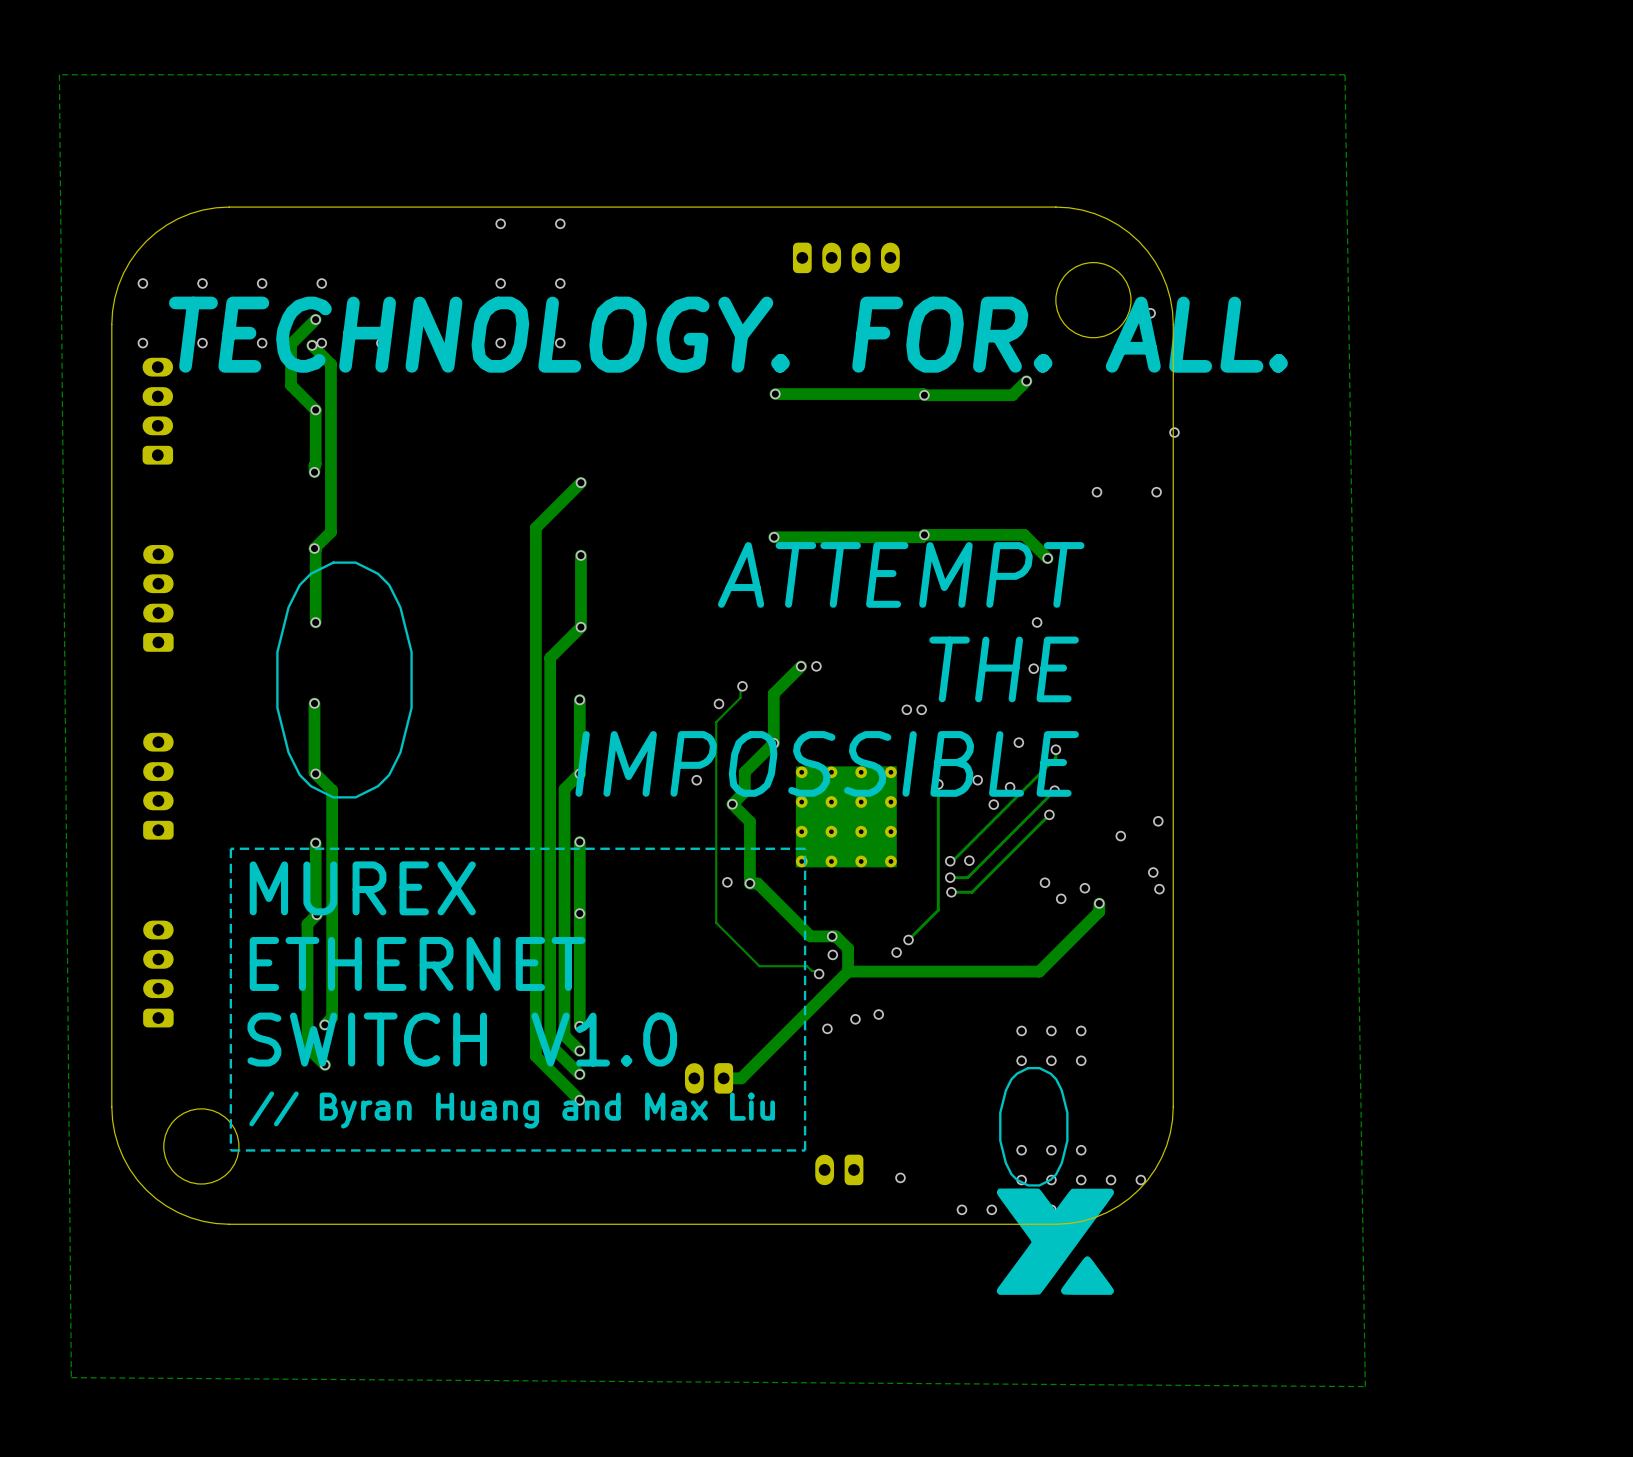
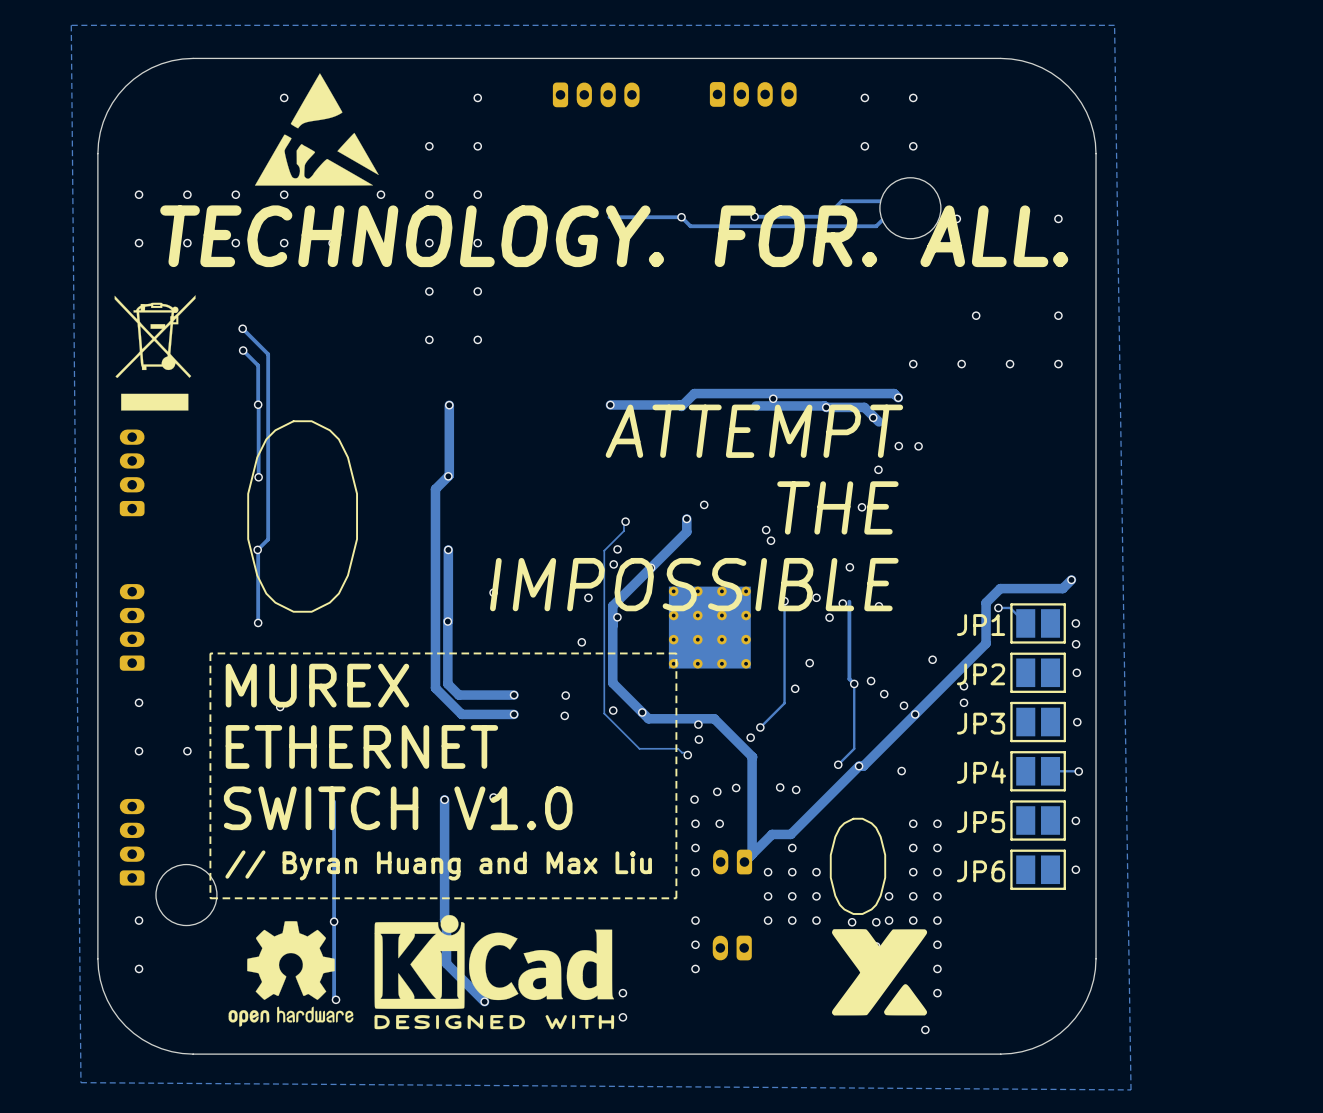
drawing: none -> [254, 73, 379, 186]
part: none -> (753, 94)
part: none -> (596, 94)
via: none -> (284, 97)
via: none -> (477, 97)
via: none -> (864, 97)
via: none -> (913, 97)
board edge: (1055, 207) (229, 207) (190, 213) (166, 225) (146, 241) (129, 262) (118, 285) (111, 324) (111, 1106) (114, 1133) (123, 1157) (146, 1189) (166, 1206) (190, 1217) (229, 1224) (1055, 1224) (1094, 1217) (1118, 1206) (1138, 1189) (1161, 1157) (1170, 1133) (1173, 1106) (1172, 311) (1161, 273) (1147, 251) (1129, 232) (1094, 213) (1055, 207) -> (1000, 58) (1032, 63) (1060, 79) (1081, 103) (1090, 122) (1095, 143) (1096, 958) (1093, 980) (1086, 1000) (1068, 1026) (1042, 1044) (1021, 1051) (1000, 1054) (193, 1054) (161, 1048) (142, 1039) (125, 1026) (107, 1000) (100, 980) (97, 958) (97, 153) (100, 132) (107, 112) (125, 86) (142, 73) (161, 63) (193, 58) (1000, 58)
via: none -> (864, 146)
via: none -> (913, 146)
part: (846, 257) -> none
via: none -> (380, 194)
track: none -> (880, 201) (841, 201) (826, 216) (754, 216)
track: none -> (900, 201) (876, 226) (690, 226) (681, 217) (609, 217)
via: none -> (754, 216)
via: none -> (681, 217)
via: none -> (1058, 218)
track: (315, 319) (291, 344) (291, 385) (315, 410) (314, 472) -> none
via: (315, 319) -> none
track: (312, 345) (330, 364) (330, 532) (314, 548) (315, 622) -> none
via: (312, 345) -> none
track: (1026, 381) (1012, 395) (775, 394) -> none
via: (1026, 381) -> none
via: (775, 394) -> none
via: (924, 395) -> none
via: none -> (429, 291)
via: none -> (477, 291)
drawing: none -> [114, 295, 196, 411]
via: (315, 410) -> none
part: (157, 411) -> none
via: none -> (1058, 315)
track: none -> (242, 328) (268, 354) (268, 539) (257, 549) (258, 622)
via: none -> (242, 328)
via: none -> (429, 339)
via: (314, 472) -> none
track: none -> (243, 350) (258, 365) (258, 477)
via: none -> (243, 350)
track: (580, 482) (535, 527) (535, 1056) (579, 1100) -> none
via position: (580, 482) -> (477, 339)
via: none -> (1010, 364)
via: none -> (1058, 364)
track: none -> (898, 397) (894, 393) (694, 393) (681, 406) (610, 404)
via: none -> (898, 397)
track: (774, 537) (1024, 534) (1047, 558) -> none
via position: (774, 537) -> (610, 404)
track: none -> (449, 405) (449, 475) (435, 489) (435, 688) (461, 714) (514, 714)
via: none -> (449, 405)
track: none -> (756, 405) (864, 407) (878, 421)
via: none -> (826, 407)
via position: (314, 548) -> (258, 404)
track: (580, 555) (580, 627) (550, 657) (550, 1044) (579, 1074) -> none
via: (580, 555) -> none
via: none -> (898, 446)
via: none -> (918, 446)
part position: (158, 598) -> (132, 472)
via position: (315, 622) -> (258, 477)
via position: (1037, 622) -> (878, 469)
via: (580, 627) -> none
via: none -> (448, 476)
via: none -> (704, 504)
track: (801, 666) (773, 693) (773, 743) -> (686, 518) (686, 531) (650, 567)
via: (801, 666) -> none
via: (816, 666) -> none
via: none -> (686, 518)
track: (579, 699) (579, 773) (564, 789) (564, 1035) (579, 1050) -> none
via: (579, 699) -> none
track: (314, 703) (314, 772) (332, 790) (332, 1017) (324, 1024) -> none
via: (314, 703) -> none
via: (719, 703) -> none
via position: (906, 709) -> (766, 530)
via: none -> (617, 549)
via: none -> (257, 549)
track: none -> (448, 549) (447, 684) (458, 695) (514, 695)
via: none -> (448, 549)
via: none -> (613, 564)
track: (1055, 749) (1055, 757) (952, 861) (950, 861) -> none
via: (1055, 749) -> none
track: none -> (1071, 579) (1062, 588) (1000, 588) (986, 602) (986, 643) (863, 766) (859, 766) (790, 834) (772, 834) (744, 862)
via: none -> (1071, 579)
track: (744, 772) (744, 791) (732, 804) (749, 821) (749, 883) (757, 883) (810, 936) (835, 936) (848, 948) (848, 971) -> (627, 591) (612, 606) (612, 682) (648, 718) (714, 718) (752, 757) (752, 854)
via: (315, 773) -> none
track: none -> (849, 601) (849, 679) (854, 683) (854, 748) (838, 764)
part position: (158, 786) -> (132, 627)
track: (1054, 790) (967, 877) (950, 877) -> none
track: none -> (998, 607) (1010, 607) (1025, 623)
via: none -> (998, 607)
via: none -> (447, 621)
via: none -> (258, 622)
JP1: none -> (1038, 623)
via: none -> (1075, 623)
track: (1049, 814) (972, 892) (951, 892) -> none
via: (1049, 814) -> none
via: (1158, 821) -> none
via: none -> (581, 642)
via: (1120, 836) -> none
via: none -> (1076, 644)
track: (579, 841) (579, 1026) -> none
via: (579, 841) -> none
track: (315, 843) (316, 914) (307, 924) (307, 1047) (325, 1064) -> none
via: (315, 843) -> none
via: none -> (932, 659)
via: (950, 861) -> none
via: (1153, 872) -> none
JP2: none -> (1038, 672)
via: none -> (1076, 672)
via: (950, 877) -> none
via: (727, 882) -> none
via: (749, 883) -> none
via: none -> (854, 683)
via: (1084, 888) -> none
via: none -> (514, 695)
via: none -> (565, 695)
track: (1099, 903) (1099, 911) (1039, 971) (848, 971) -> none
via: (1099, 903) -> none
via: none -> (139, 702)
via: none -> (964, 702)
via: (579, 913) -> none
via: none -> (903, 705)
via: none -> (613, 710)
via: none -> (642, 712)
via: none -> (514, 714)
via: none -> (915, 714)
via: none -> (564, 715)
JP3: none -> (1038, 722)
via: none -> (1077, 722)
via: none -> (139, 751)
via: none -> (187, 751)
track: (848, 971) (741, 1078) (723, 1078) -> none
part: (158, 974) -> none
via: none -> (838, 764)
via: none -> (859, 766)
via: none -> (901, 771)
JP4: none -> (1038, 771)
track: none -> (1078, 771) (1050, 771)
via: none -> (1078, 771)
via: none -> (780, 787)
via: none -> (796, 789)
via: (324, 1024) -> none
track: none -> (444, 799) (446, 963) (484, 1001)
via: none -> (444, 799)
via: (1021, 1030) -> none
via: (1051, 1030) -> none
via: (1081, 1030) -> none
track: none -> (334, 801) (334, 997) (336, 999)
via: (579, 1050) -> none
JP5: none -> (1038, 820)
via: none -> (1075, 820)
via: none -> (695, 823)
via: none -> (719, 823)
via: none -> (913, 823)
via: none -> (937, 823)
via: (1021, 1060) -> none
via: (1051, 1060) -> none
via: (1081, 1060) -> none
via: (325, 1064) -> none
via: (579, 1074) -> none
part: (709, 1078) -> none
part: none -> (132, 842)
via: none -> (695, 847)
via: none -> (792, 847)
via: none -> (913, 847)
via: none -> (937, 847)
via: (579, 1100) -> none
part: none -> (732, 862)
JP6: none -> (1038, 869)
via: none -> (1075, 869)
via: none -> (695, 872)
via: none -> (768, 872)
via: none -> (792, 872)
via: none -> (816, 872)
via: none -> (913, 872)
via: none -> (937, 872)
text position: 0 (1033, 1126) -> 0 (857, 866)
via: none -> (768, 896)
via: none -> (792, 896)
via: none -> (816, 896)
via: none -> (889, 896)
via: none -> (913, 896)
via: none -> (937, 896)
via: (1021, 1150) -> none
via: (1051, 1150) -> none
via: (1081, 1150) -> none
part: (839, 1169) -> none
drawing: none -> [228, 915, 615, 1030]
via: none -> (139, 920)
via: none -> (695, 920)
via: (900, 1177) -> none
via: none -> (768, 920)
via: none -> (792, 920)
via: none -> (816, 920)
via: none -> (889, 920)
via: none -> (913, 920)
via: none -> (937, 920)
via: none -> (334, 921)
via: (1081, 1180) -> none
via: (1111, 1180) -> none
via: (1140, 1180) -> none
via: none -> (695, 944)
via: none -> (937, 944)
via: (961, 1209) -> none
via: (991, 1209) -> none
part: none -> (732, 948)
via: none -> (139, 968)
via: none -> (695, 968)
via: none -> (937, 968)
via: none -> (622, 993)
via: none -> (937, 993)
via: none -> (336, 999)
via: none -> (484, 1001)
via: none -> (622, 1017)
via: none -> (925, 1029)

